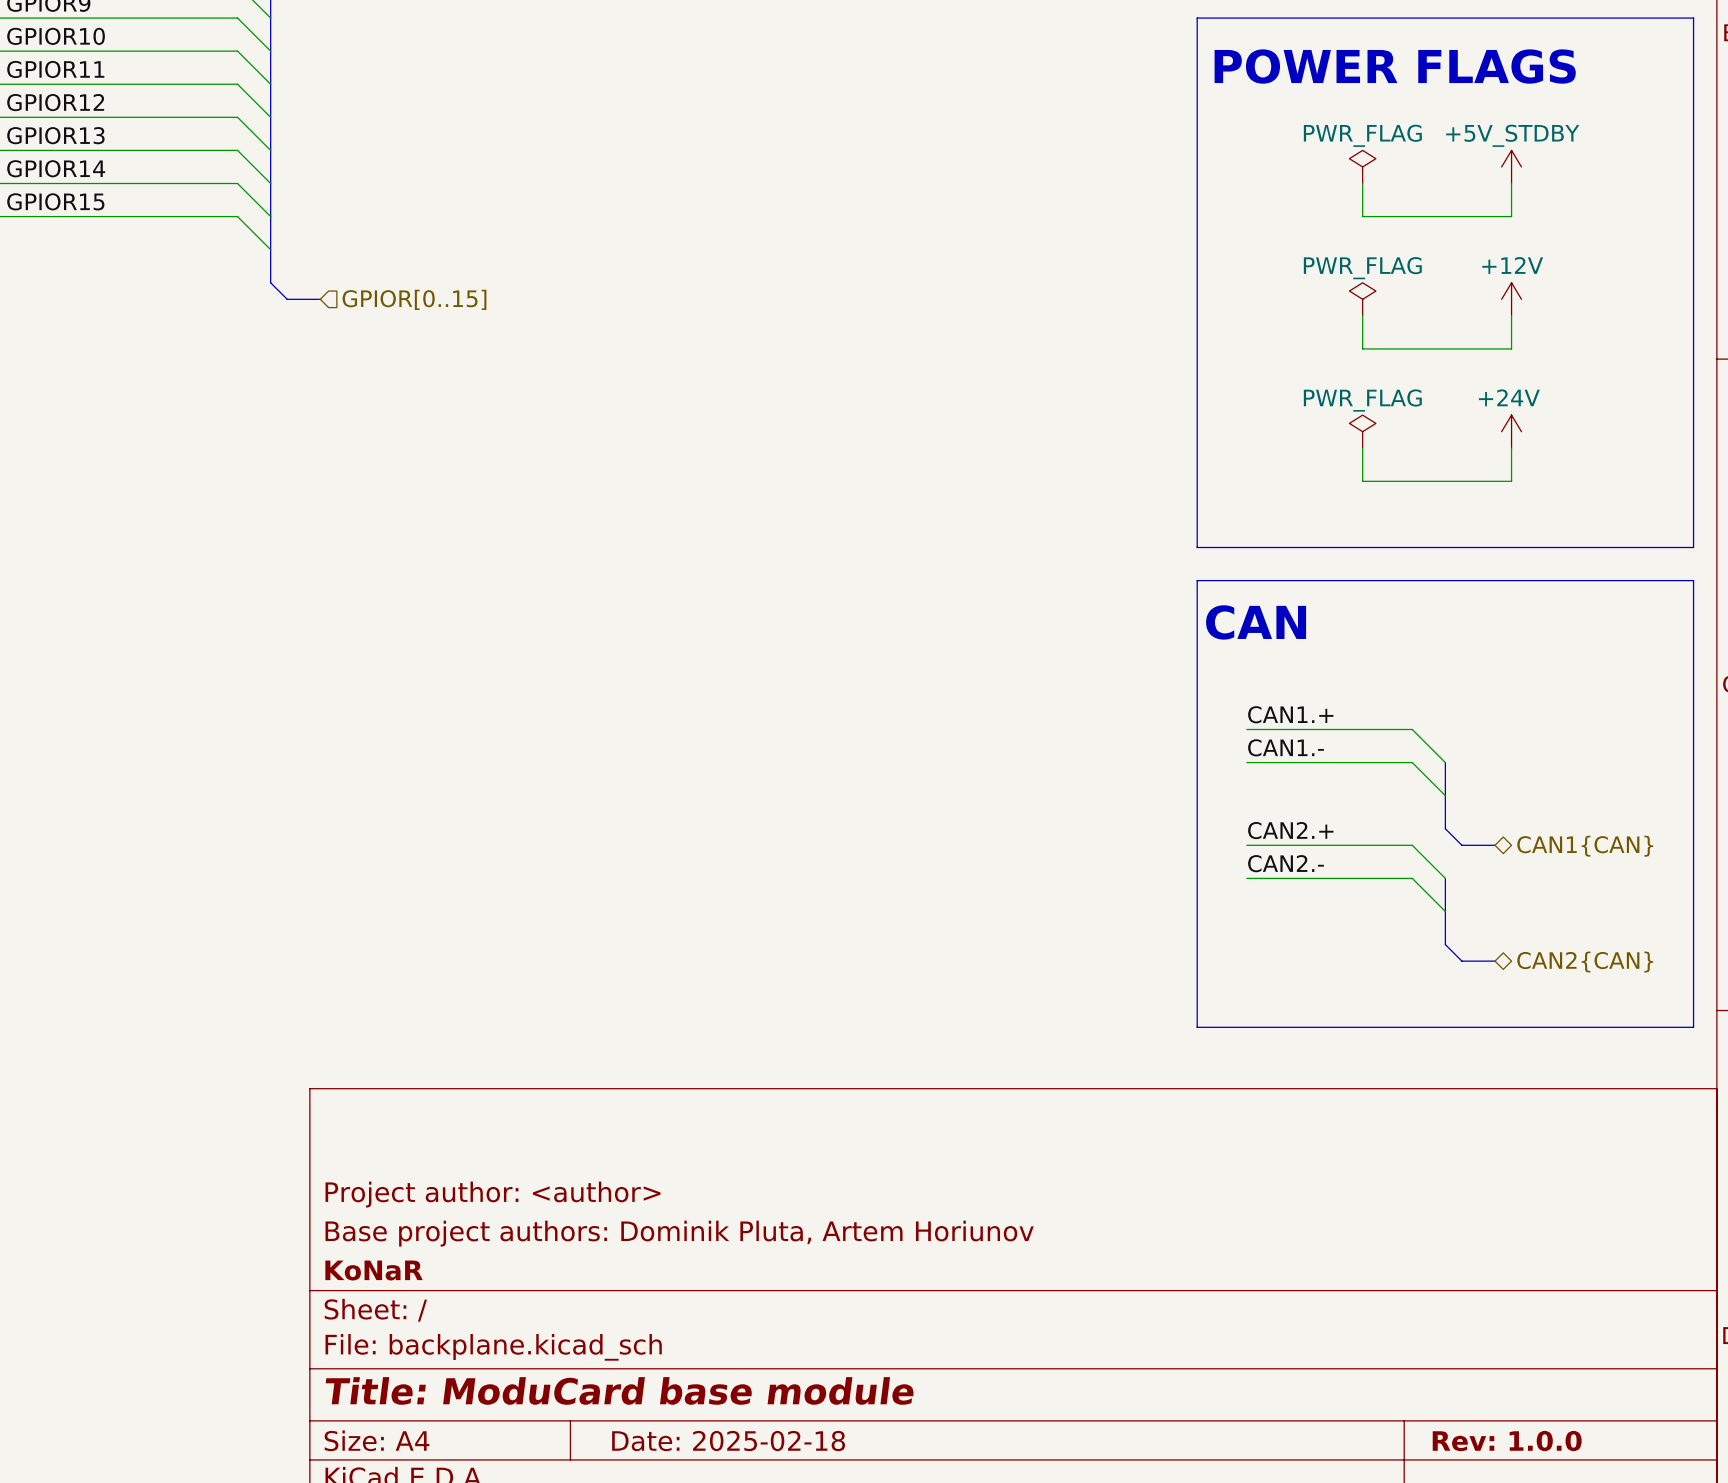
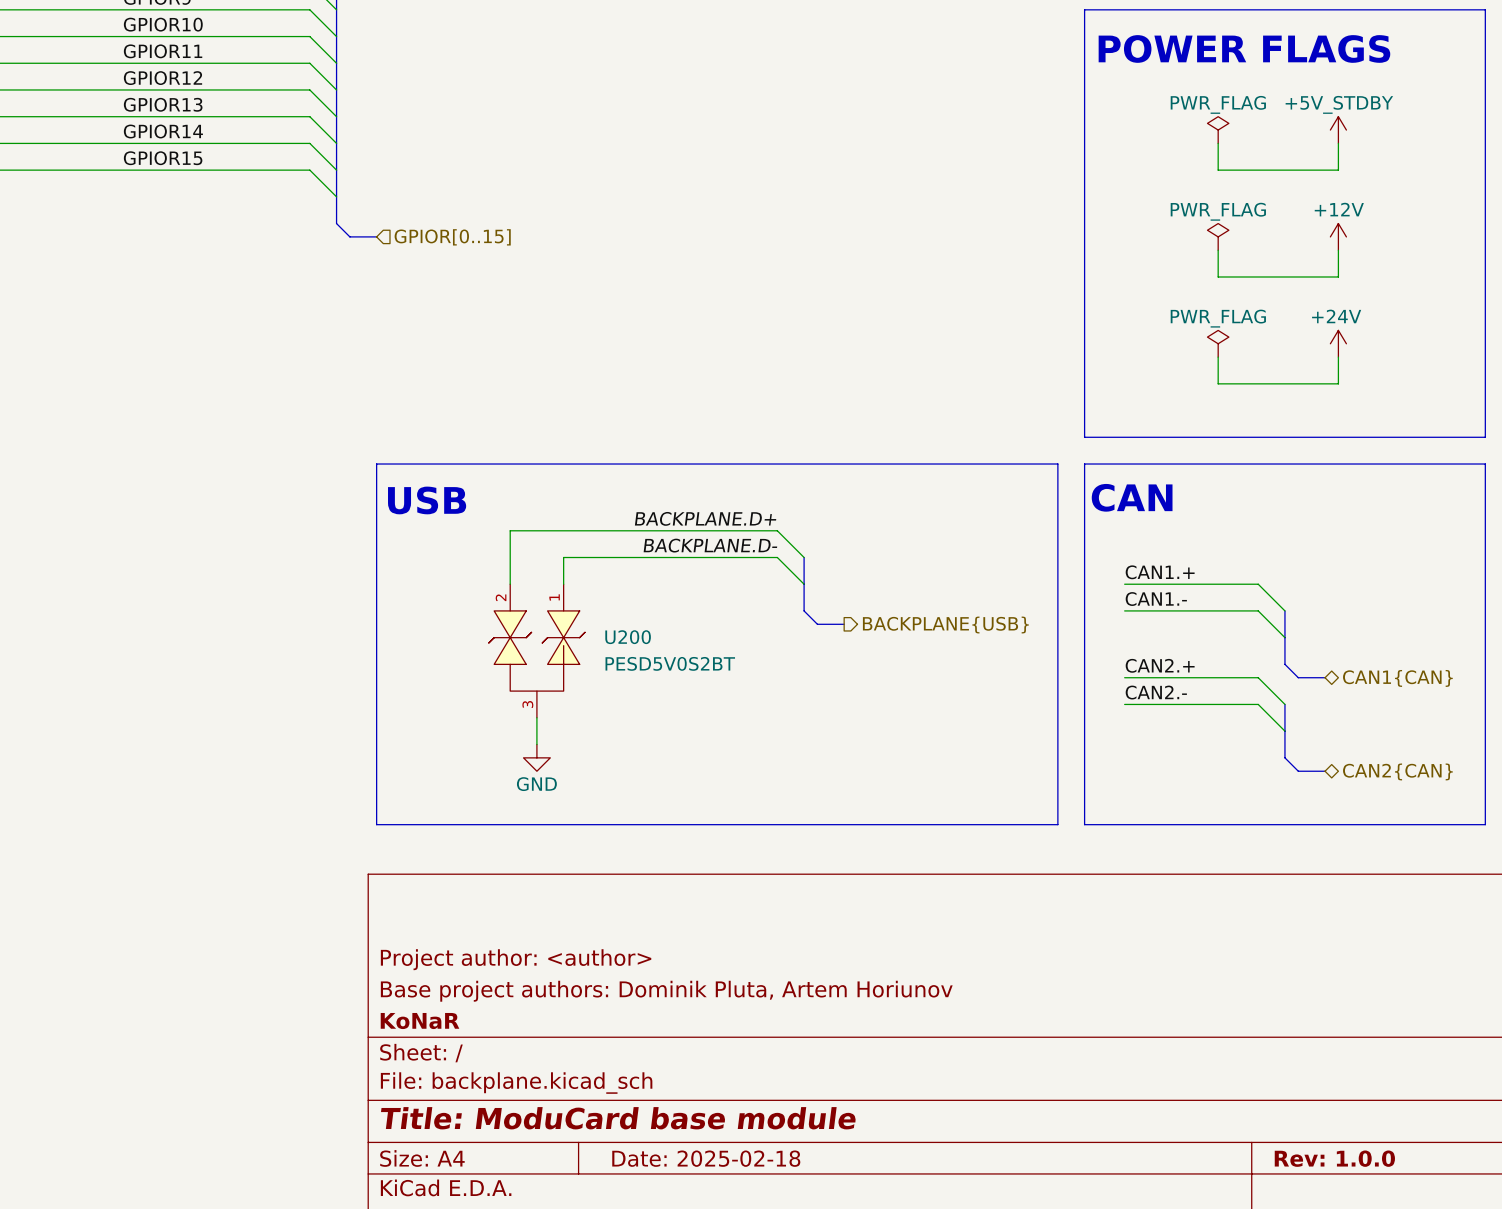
line: none -> (376, 464) (1057, 464) (1057, 824) (376, 824) (376, 464)
text: none -> USB (427, 500)
label: none -> BACKPLANE.D+ (705, 518)
label: none -> BACKPLANE.D- (710, 545)
wire: none -> (804, 557) (777, 530) (510, 530) (510, 584)
bus: none -> (804, 557) (804, 610) (817, 624) (844, 624)
wire: none -> (563, 584) (563, 557) (777, 557) (804, 584)
hierarchical label: none -> BACKPLANE{USB} (945, 625)
U200: none -> PESD5V0S2BT (536, 651)
wire: none -> (536, 717) (536, 744)
power symbol: none -> GND (536, 757)

